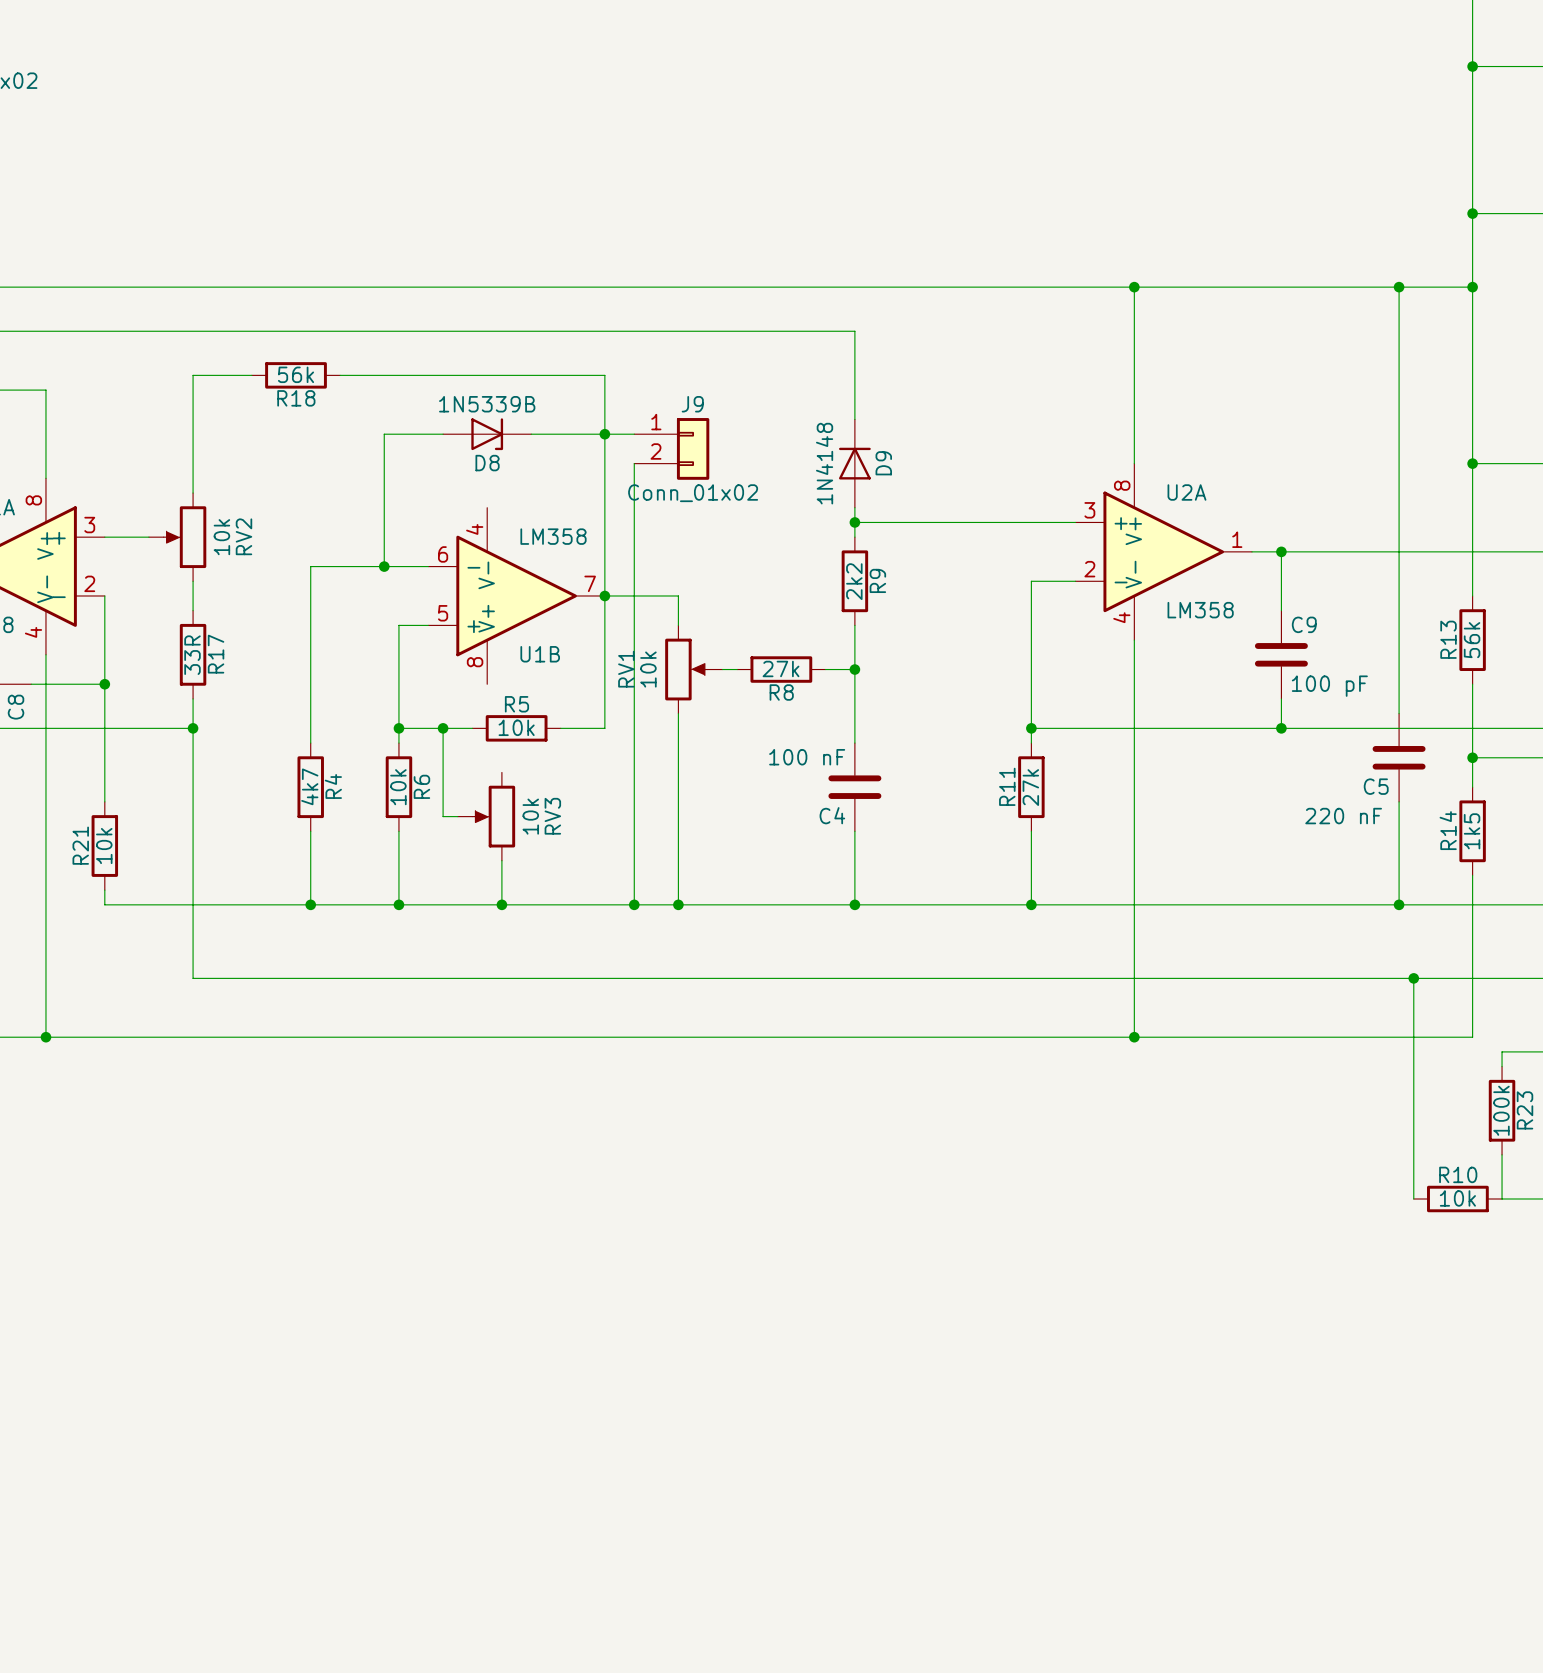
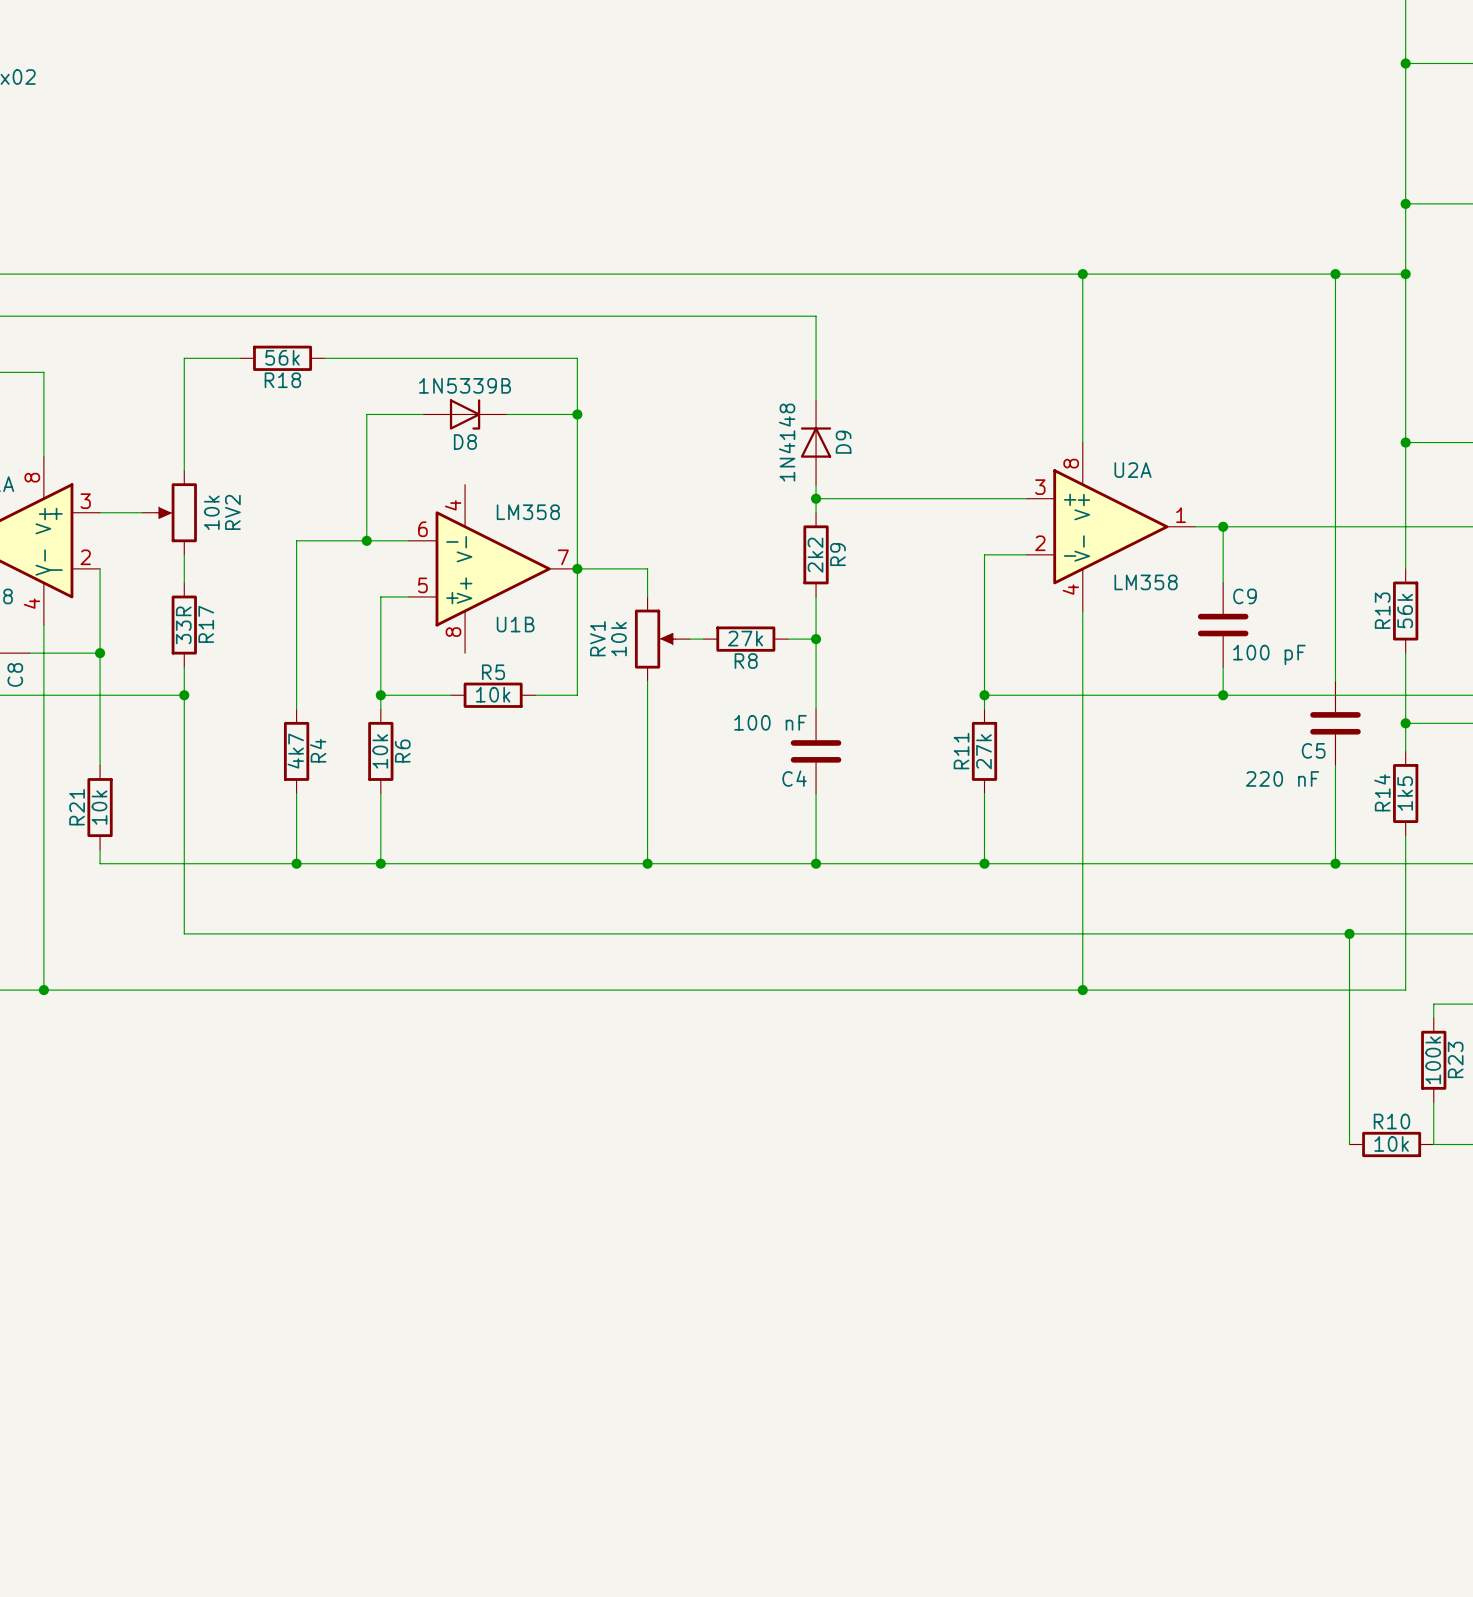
wire: (604, 434) (634, 434) -> none
J9: Conn_01x02 (671, 448) -> none
wire: (634, 463) (634, 904) -> none
wire: (443, 728) (443, 816) (457, 816) -> none
junction: (443, 728) -> none
RV3: 10k (486, 816) -> none
wire: (501, 860) (501, 904) -> none
junction: (501, 904) -> none
junction: (634, 904) -> none

